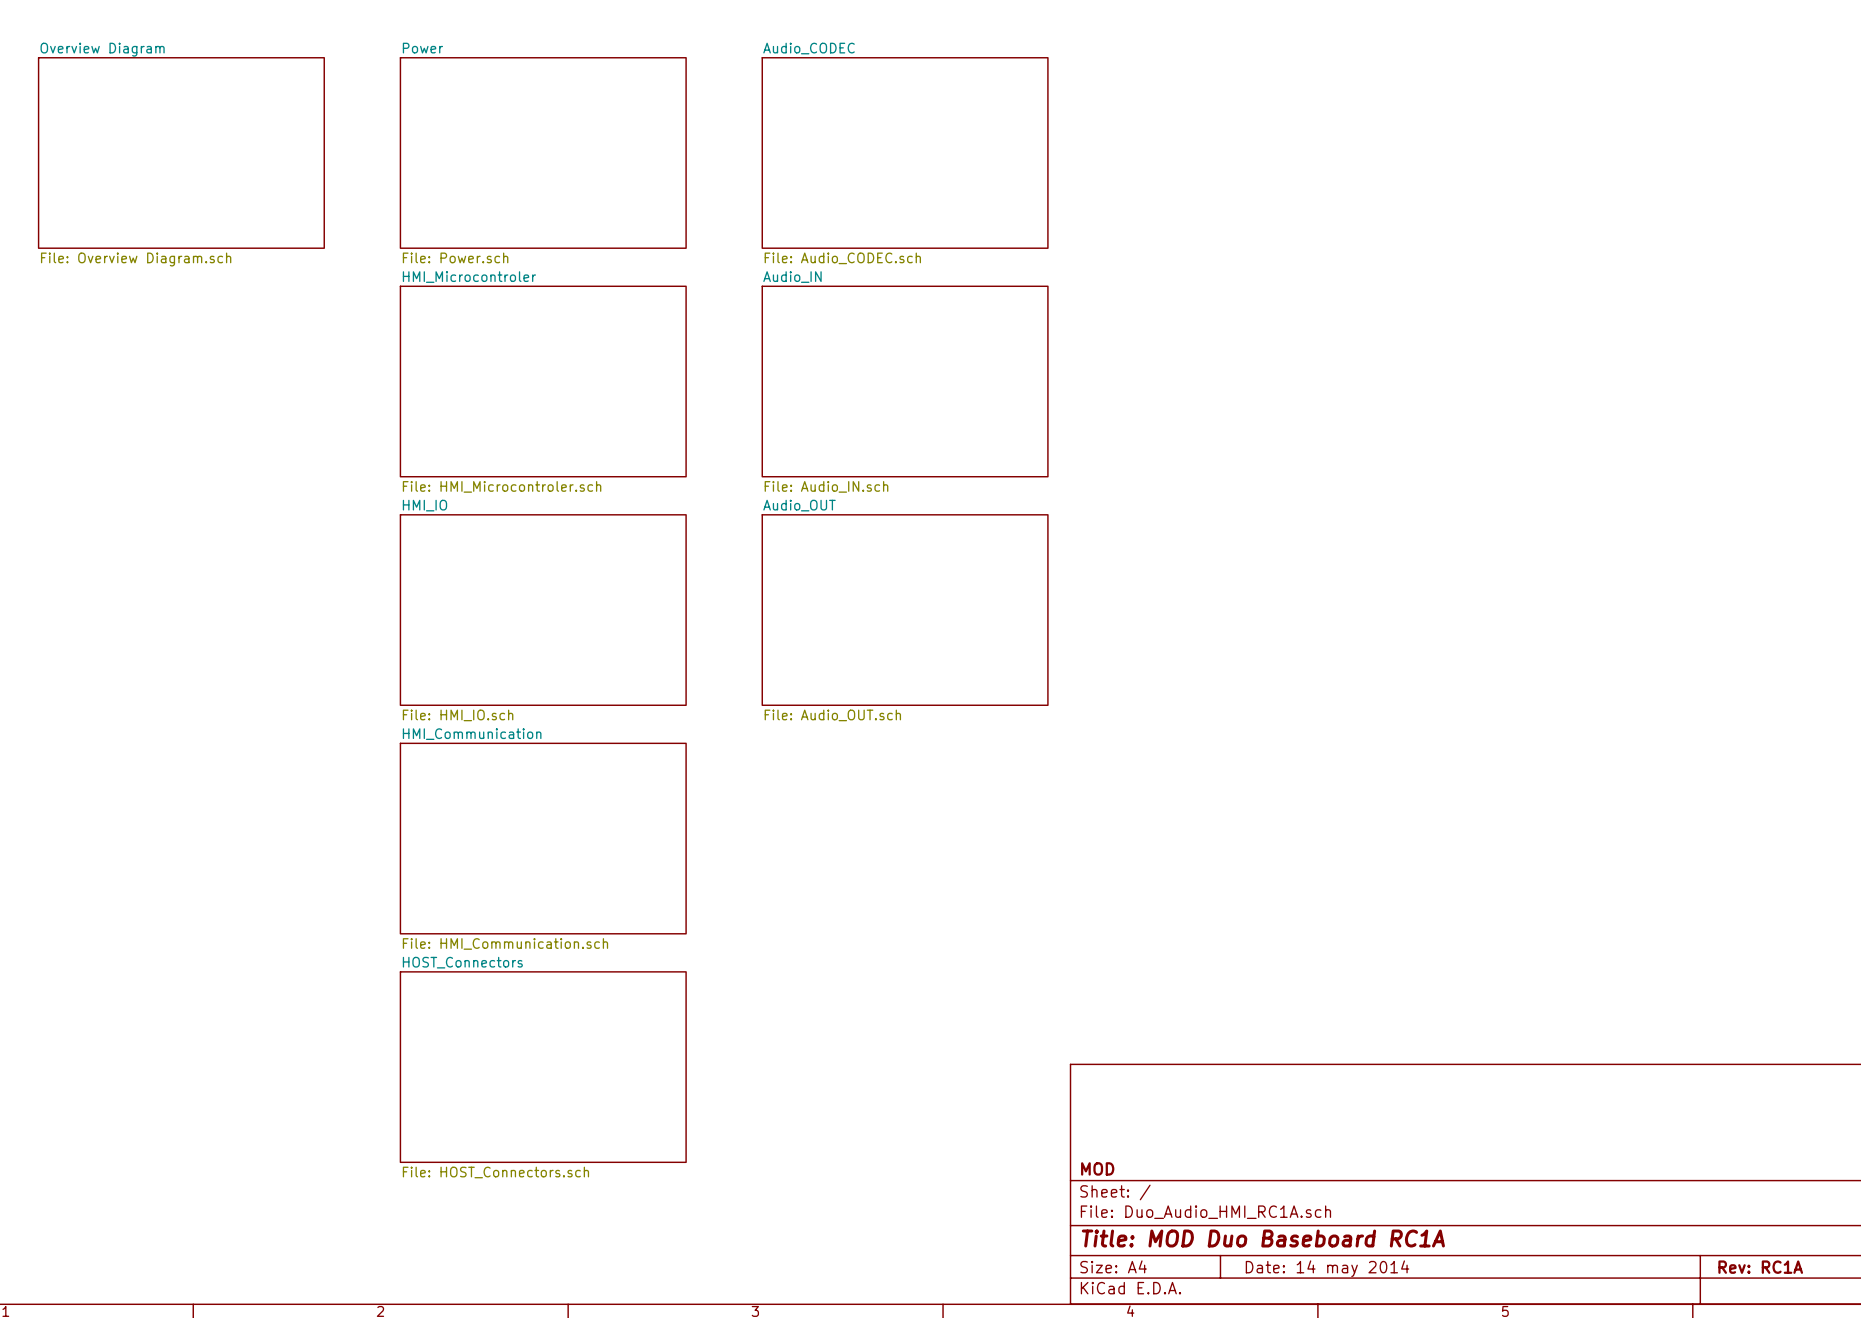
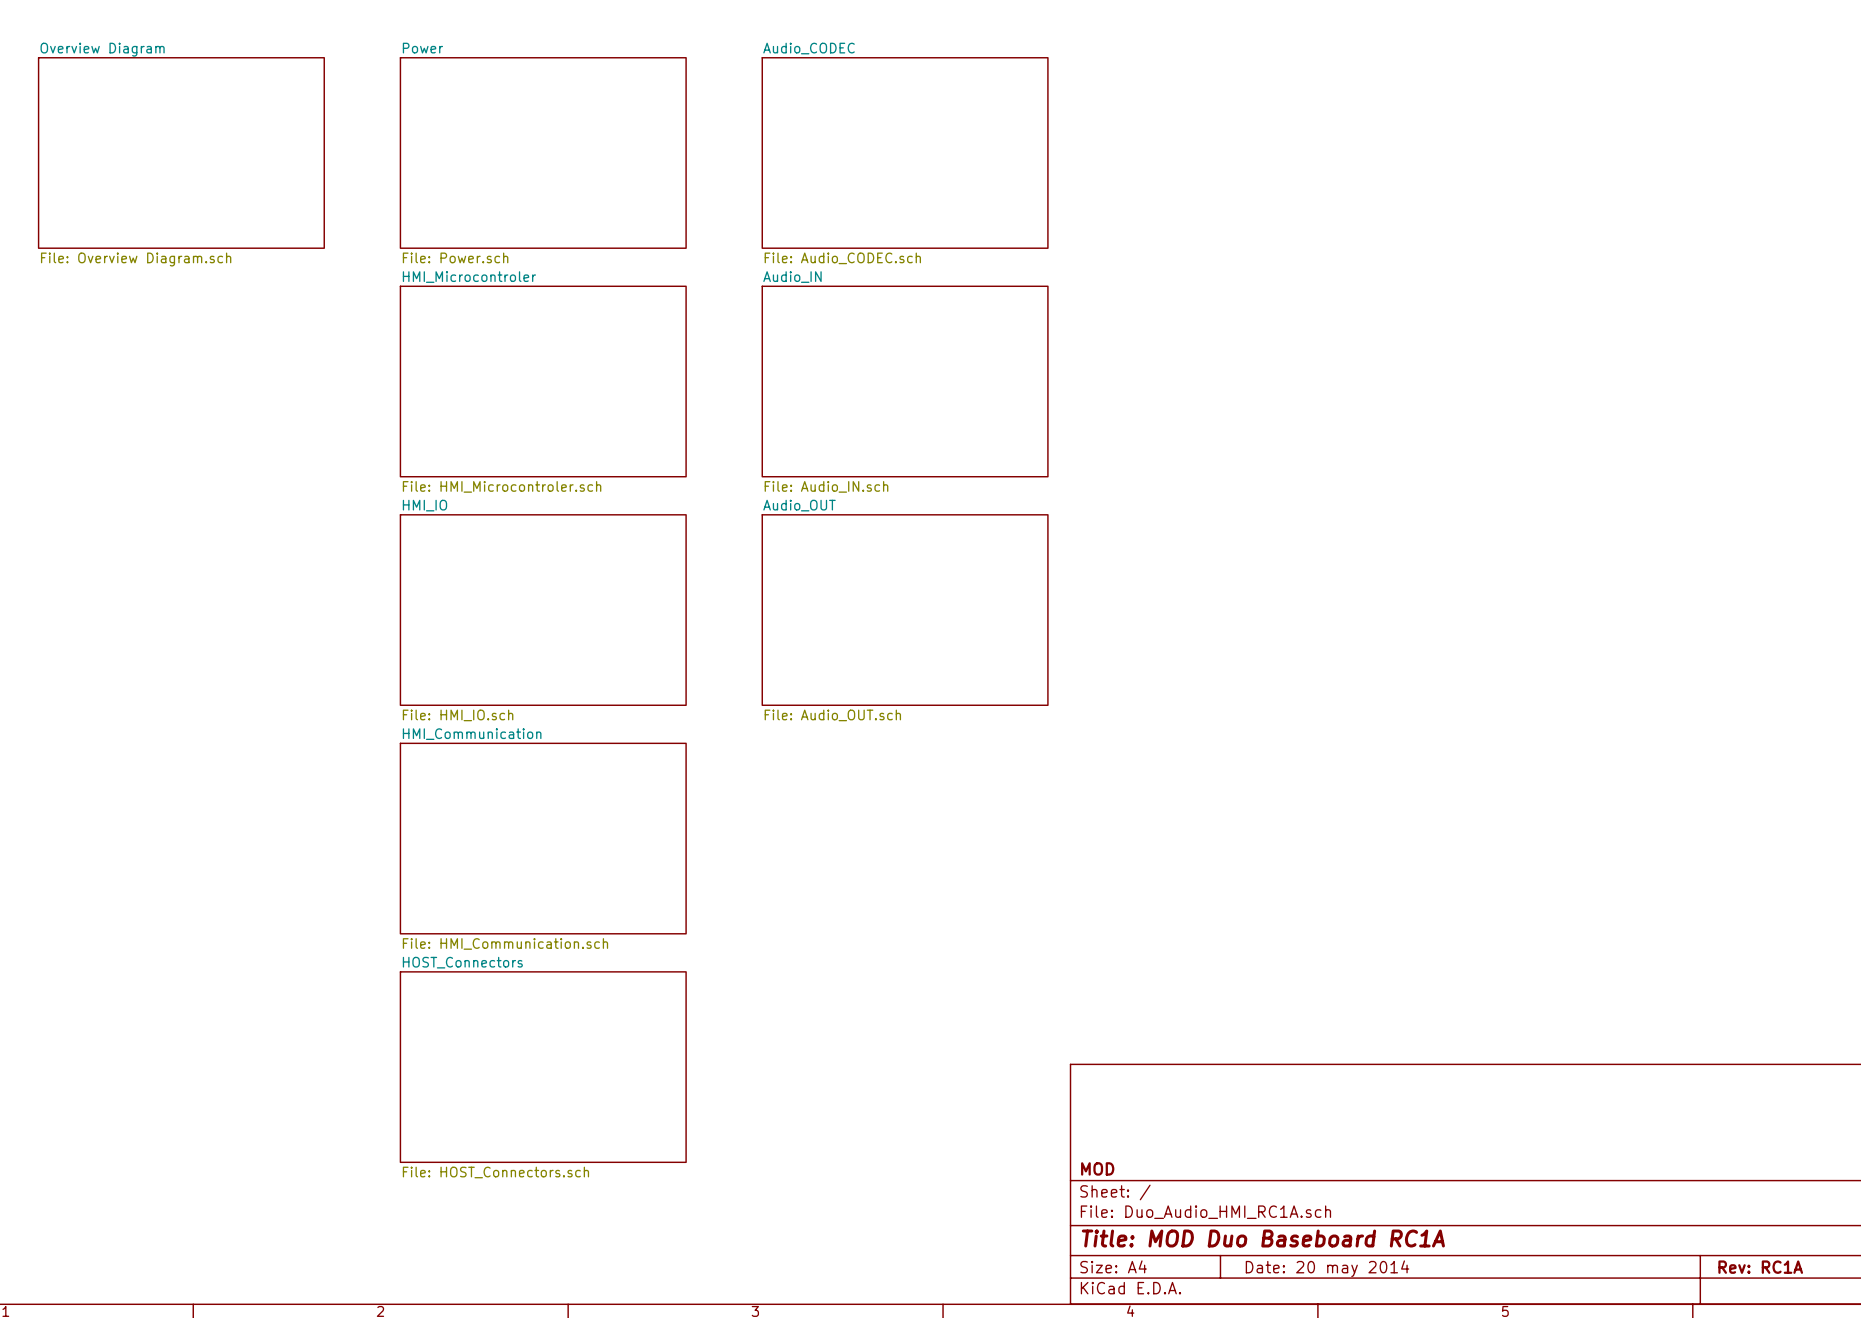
title block: Date: 14 may 2014 (1327, 1268) -> Date: 20 may 2014 (1327, 1268)

